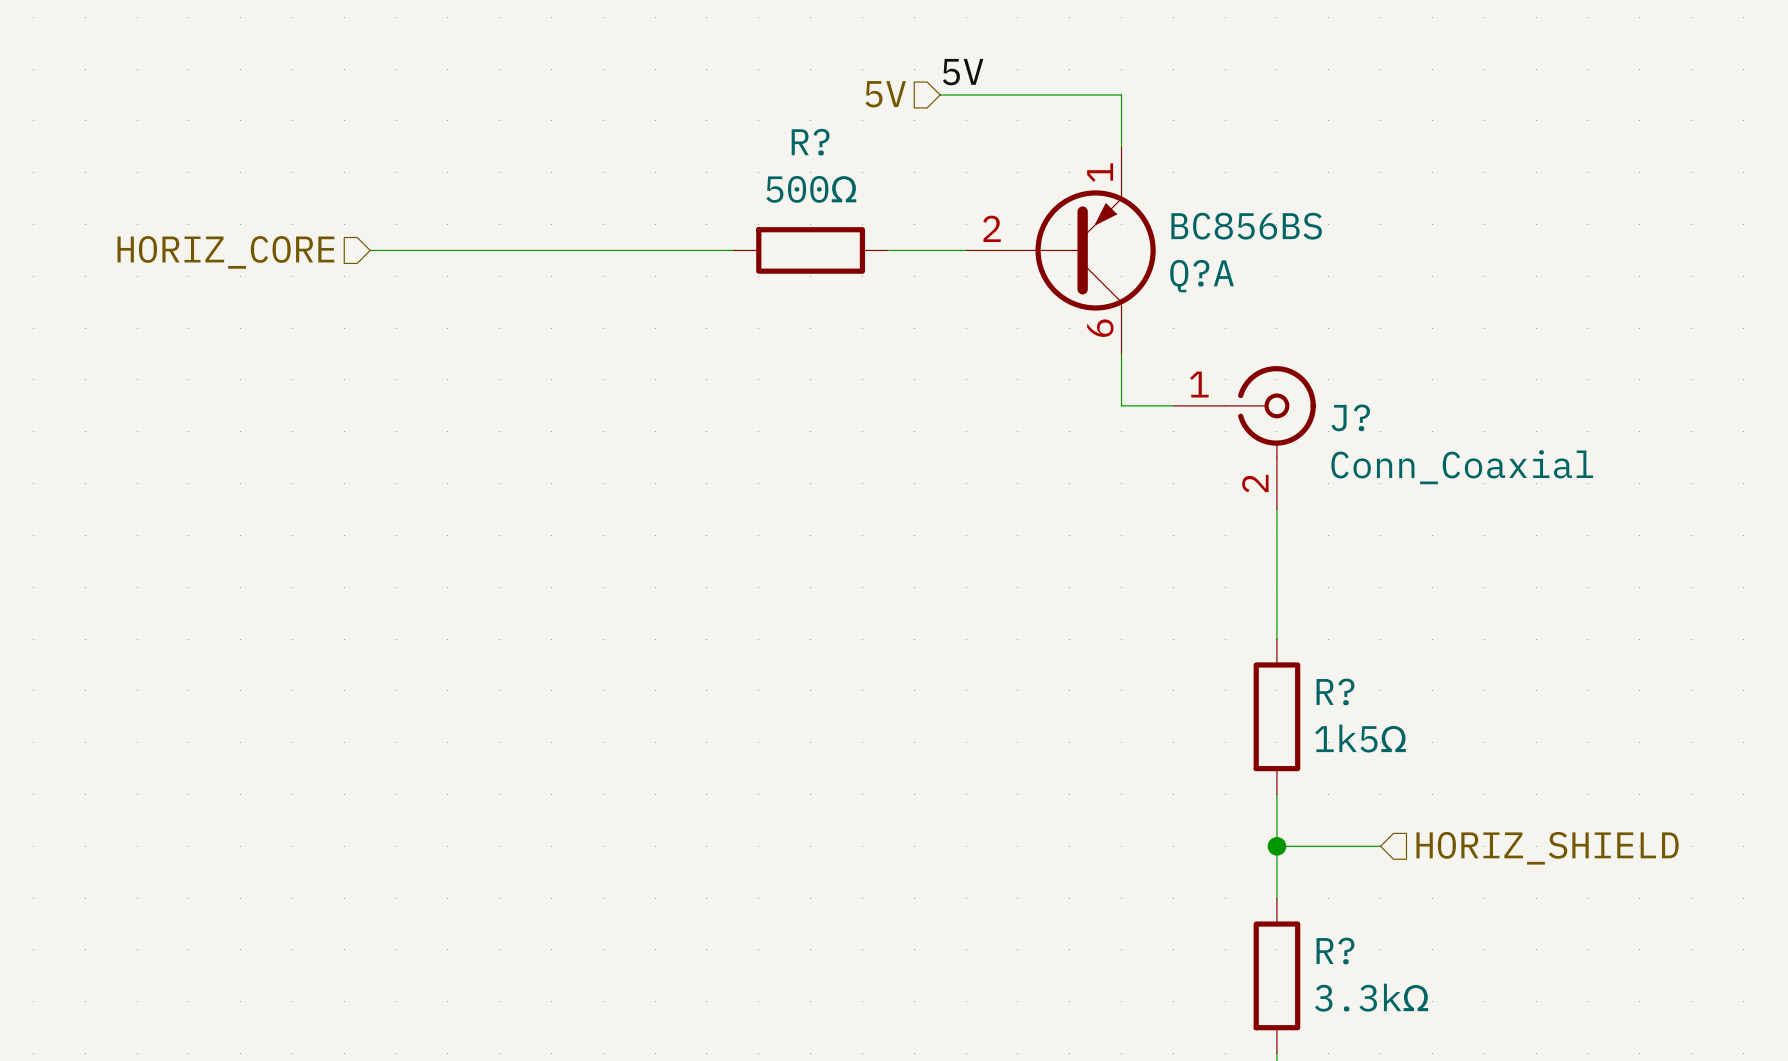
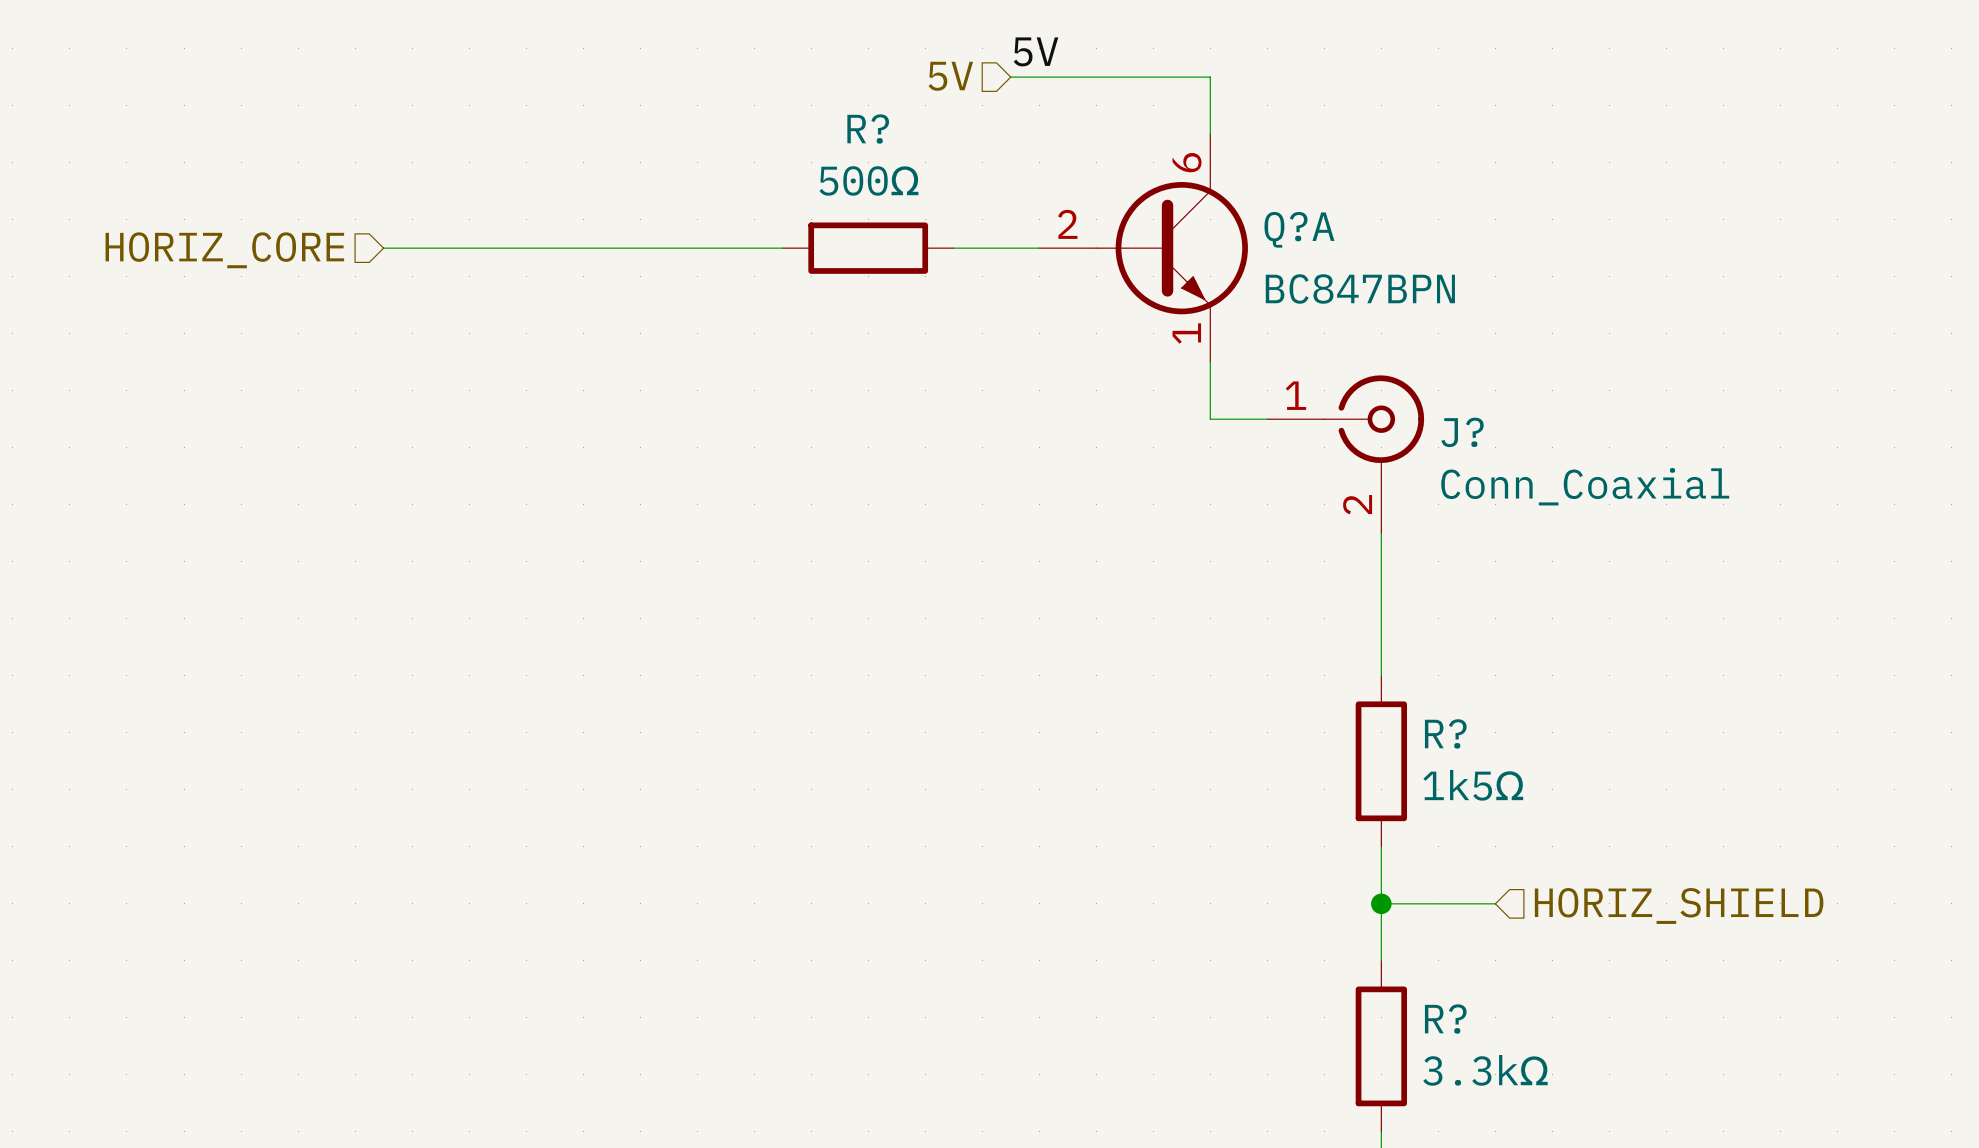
Q?A symbol: [966, 146, 1156, 355] -> [1039, 134, 1248, 363]
Q?A value: BC856BS (1246, 226) -> BC847BPN (1360, 288)
Q?A name position: Q?A (1202, 276) -> Q?A (1299, 229)

